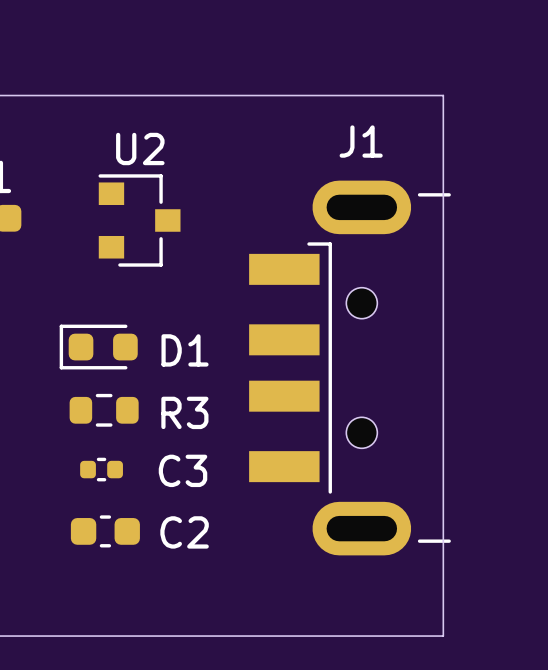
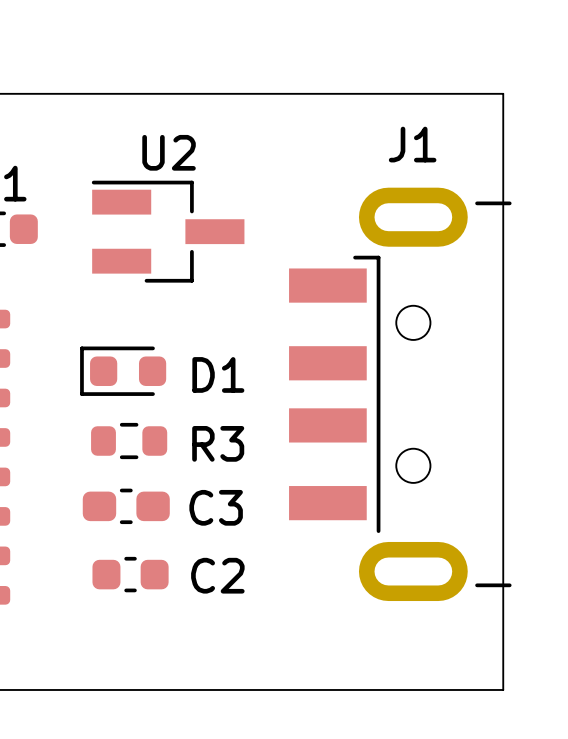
U2 footprint: [98, 174, 181, 267] -> [91, 180, 245, 283]
C3 footprint: [80, 457, 123, 482] -> [82, 488, 170, 525]

